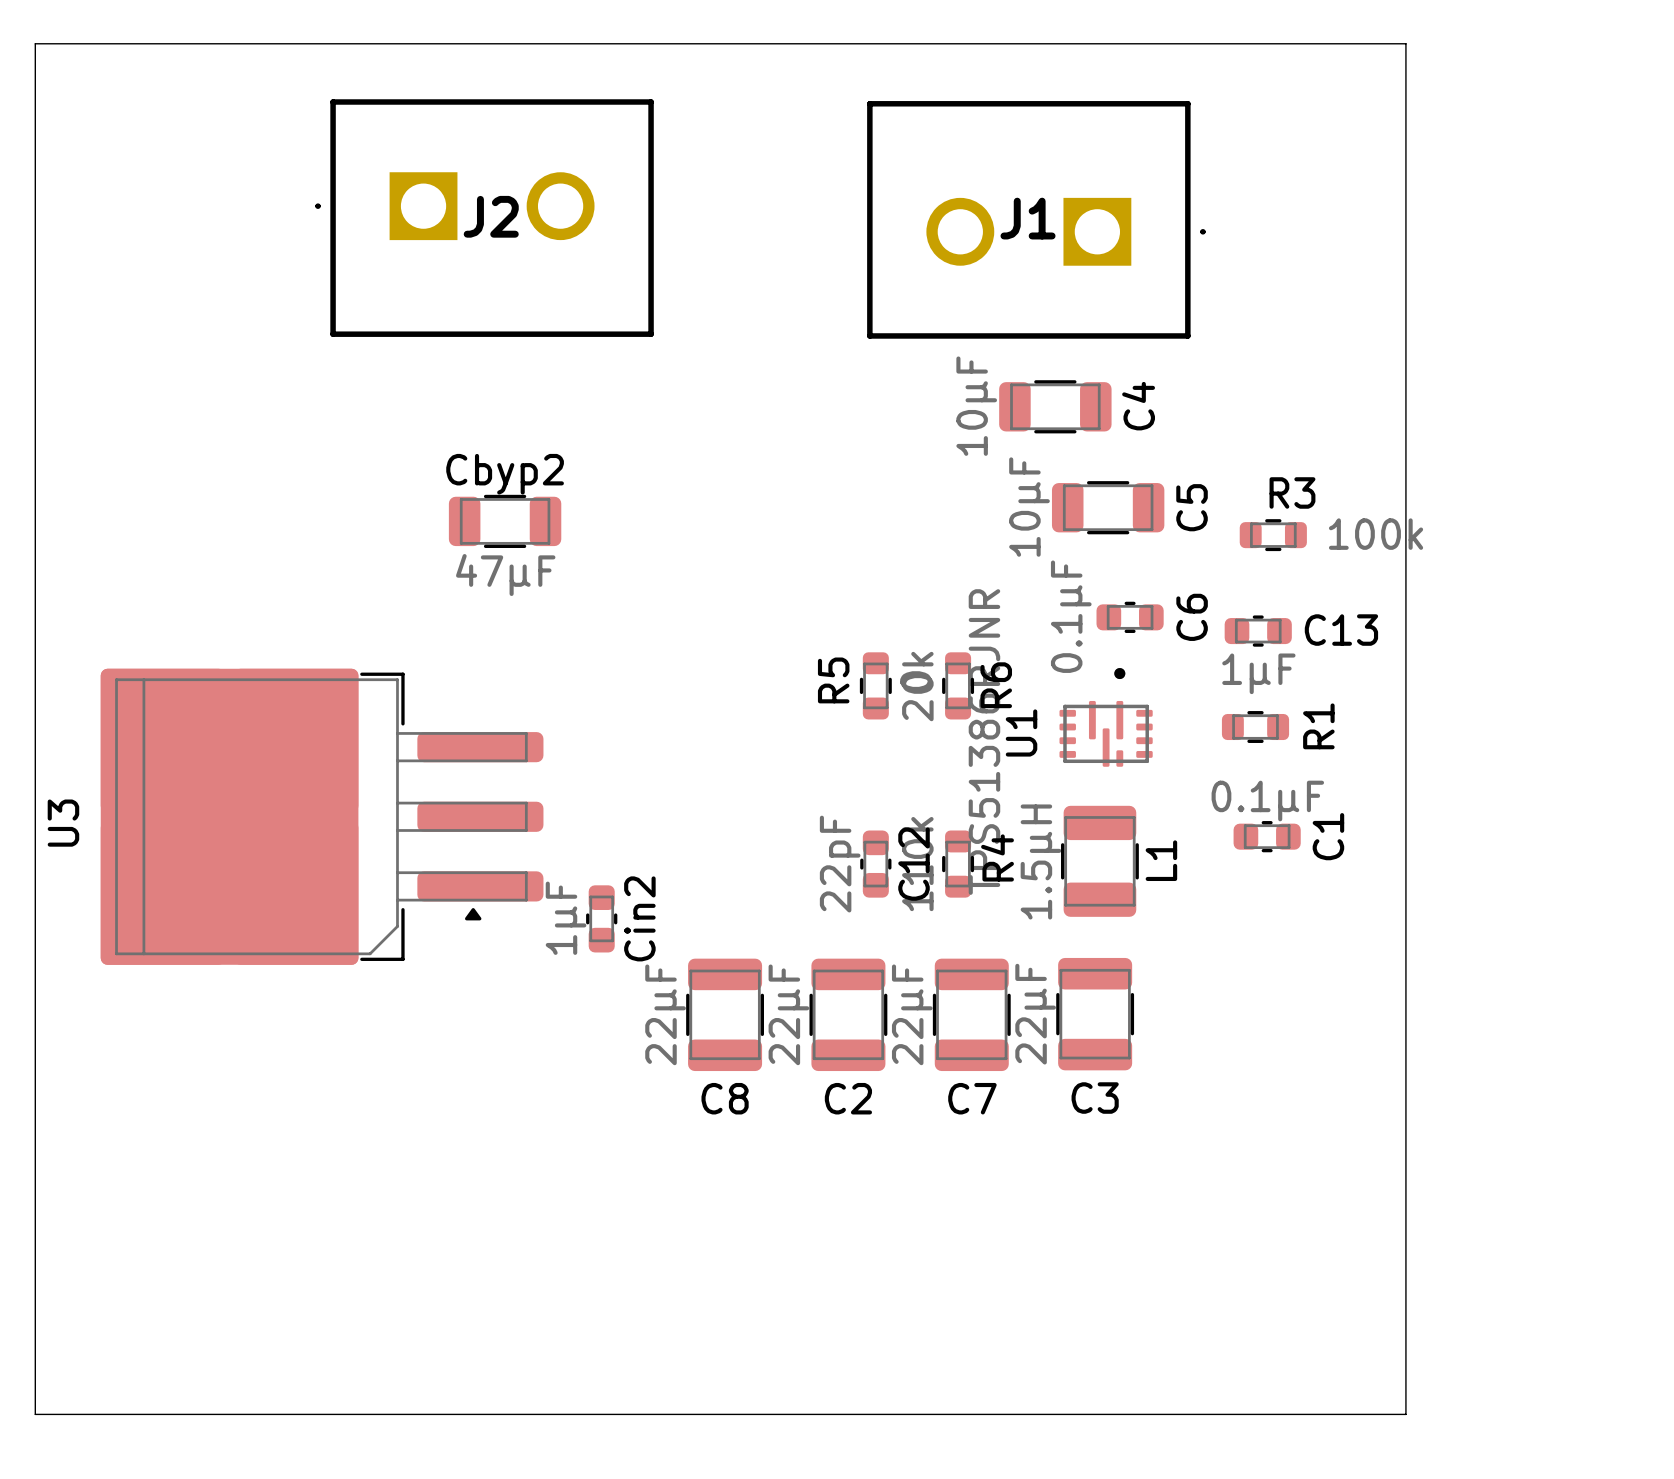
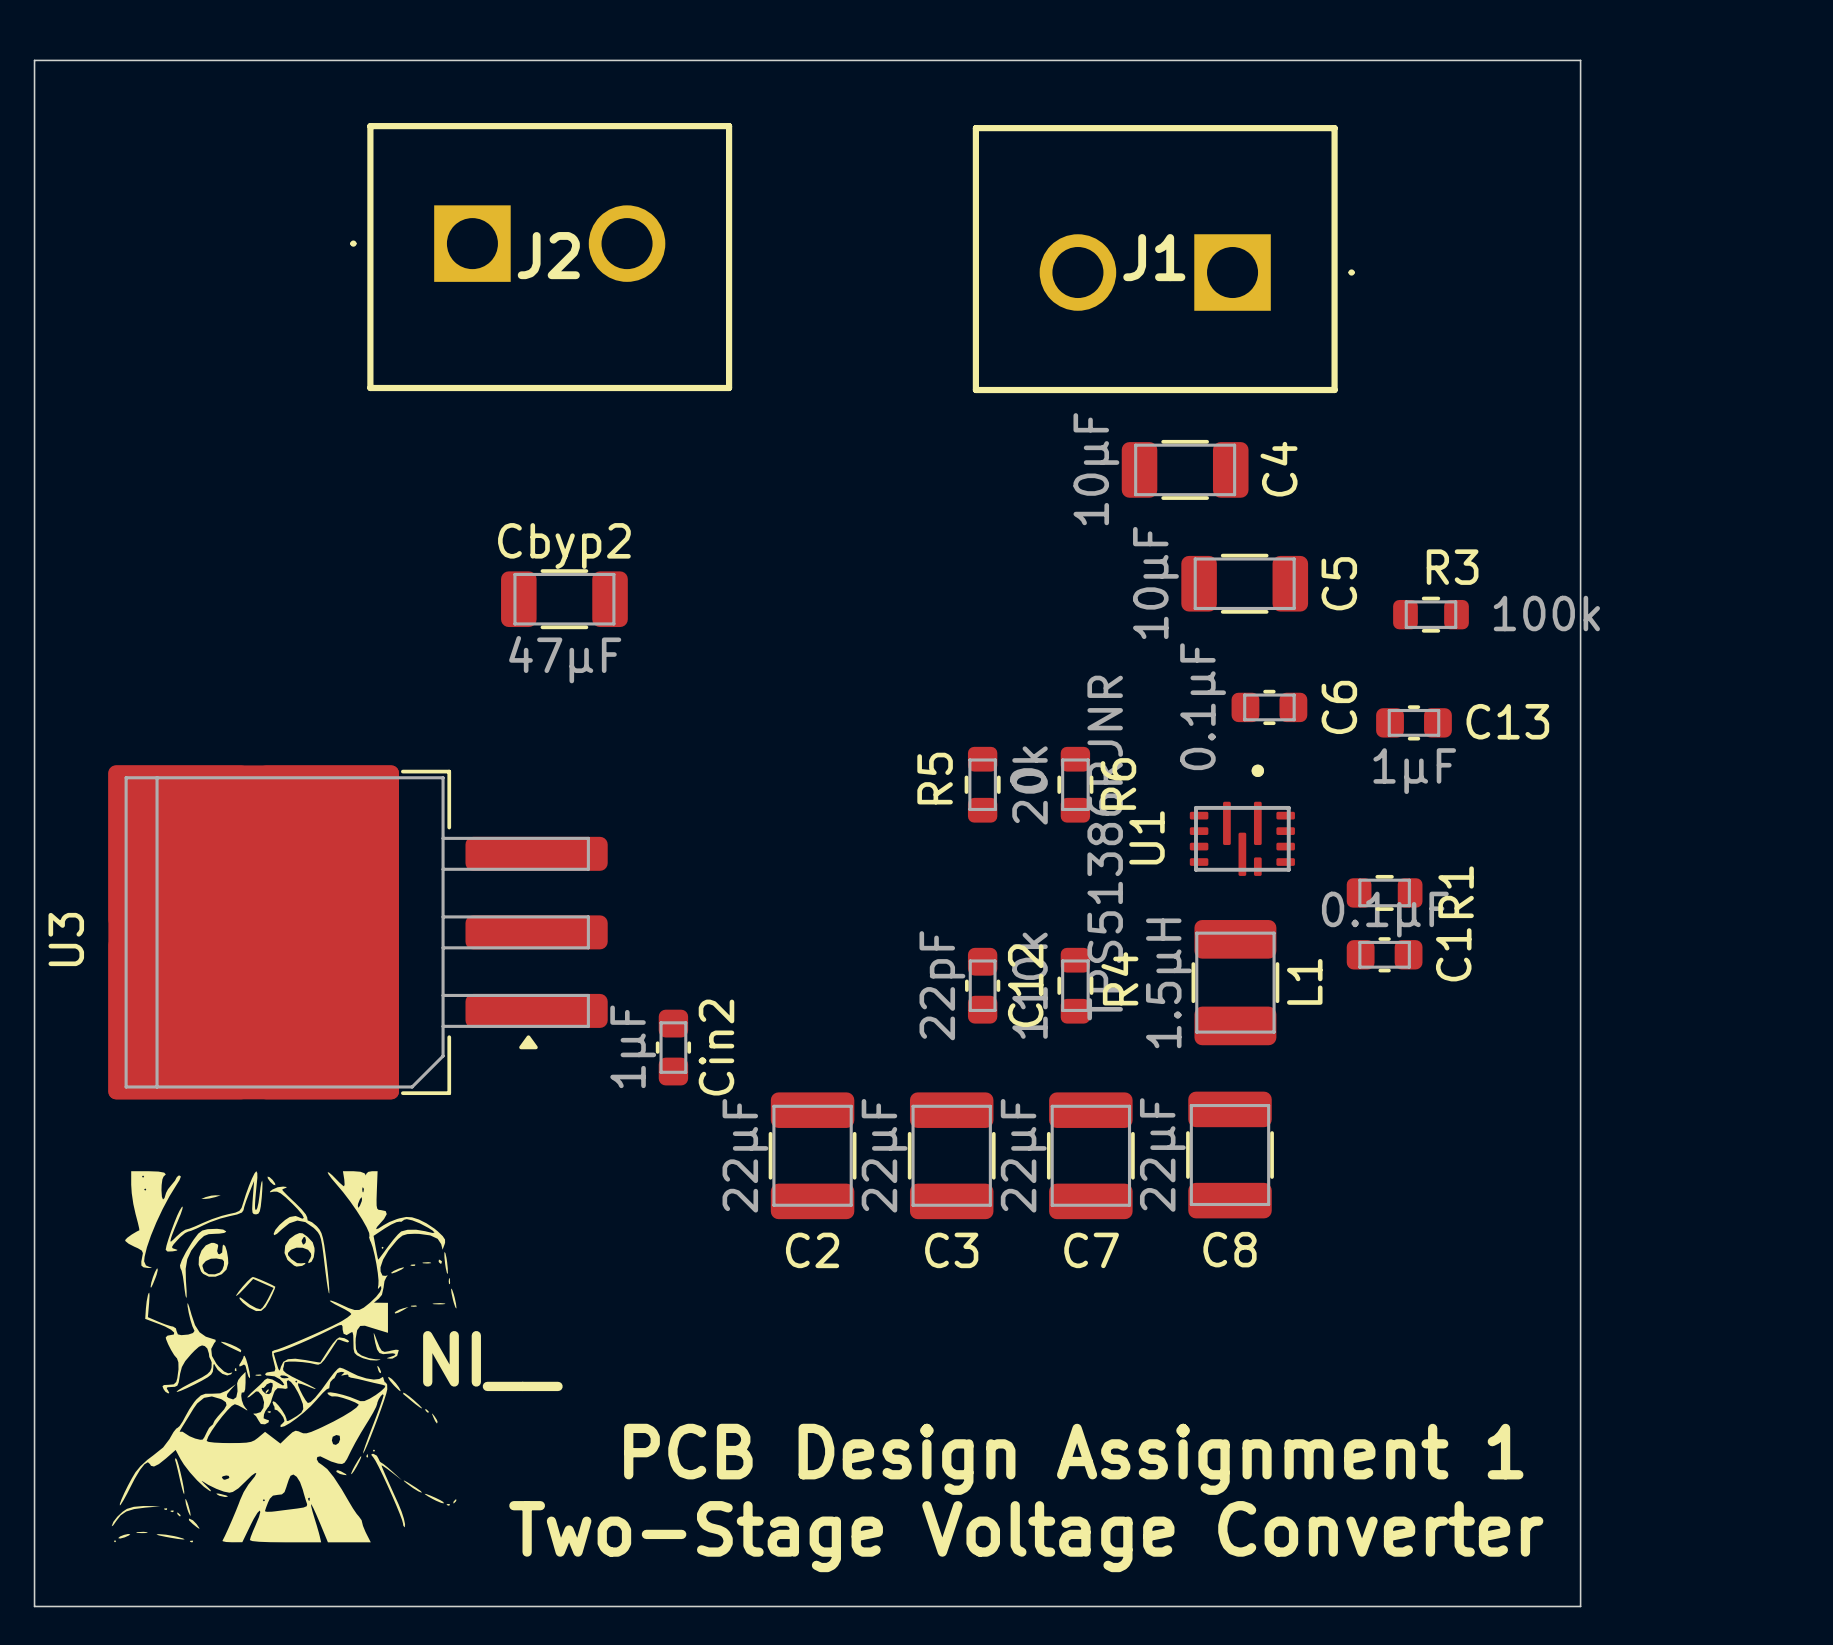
R1 position: (1255, 727) -> (1384, 892)
C1 position: (1267, 836) -> (1384, 954)
drawing: none -> [111, 1171, 457, 1543]
C8 name: C8 (725, 1098) -> C2 (812, 1250)
C2 name: C2 (848, 1098) -> C3 (951, 1250)
C3 name: C3 (1095, 1098) -> C8 (1230, 1249)
text: none -> NI__ (492, 1361)
text: none -> PCB Design Assignment 1 (1073, 1459)
text: none -> Two-Stage Voltage Converter (1026, 1536)

